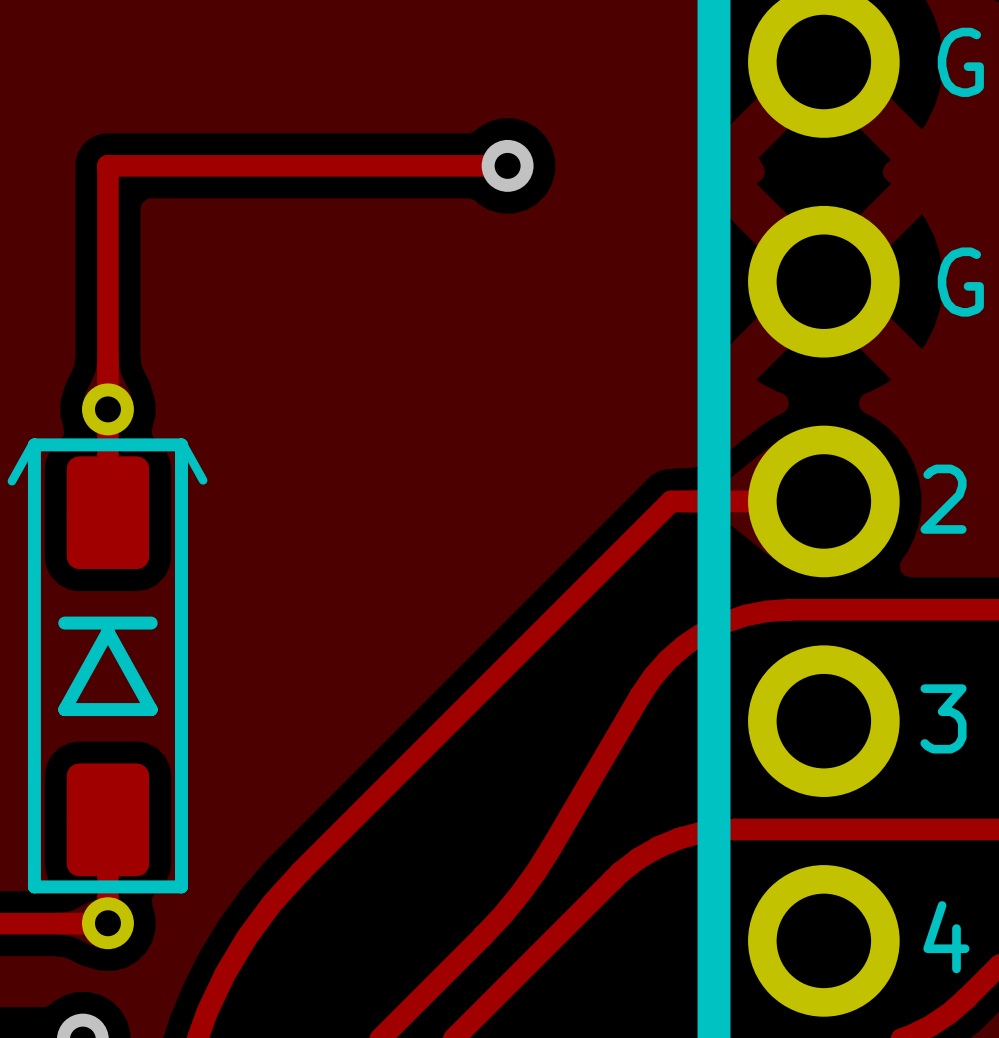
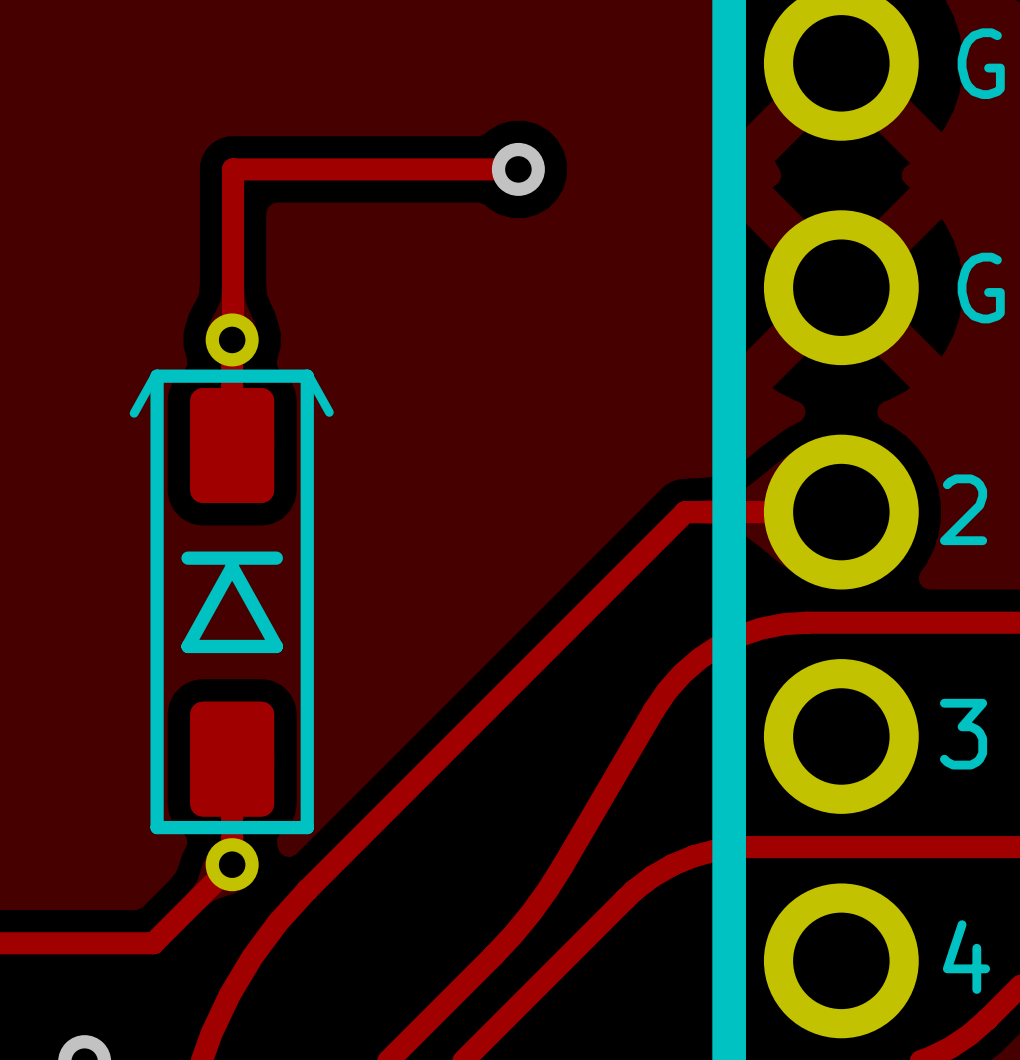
track: (228, 165) (107, 165) (107, 409) -> (233, 169) (233, 339)
part position: (107, 666) -> (231, 602)
track: none -> (232, 864) (153, 943) (109, 943)

